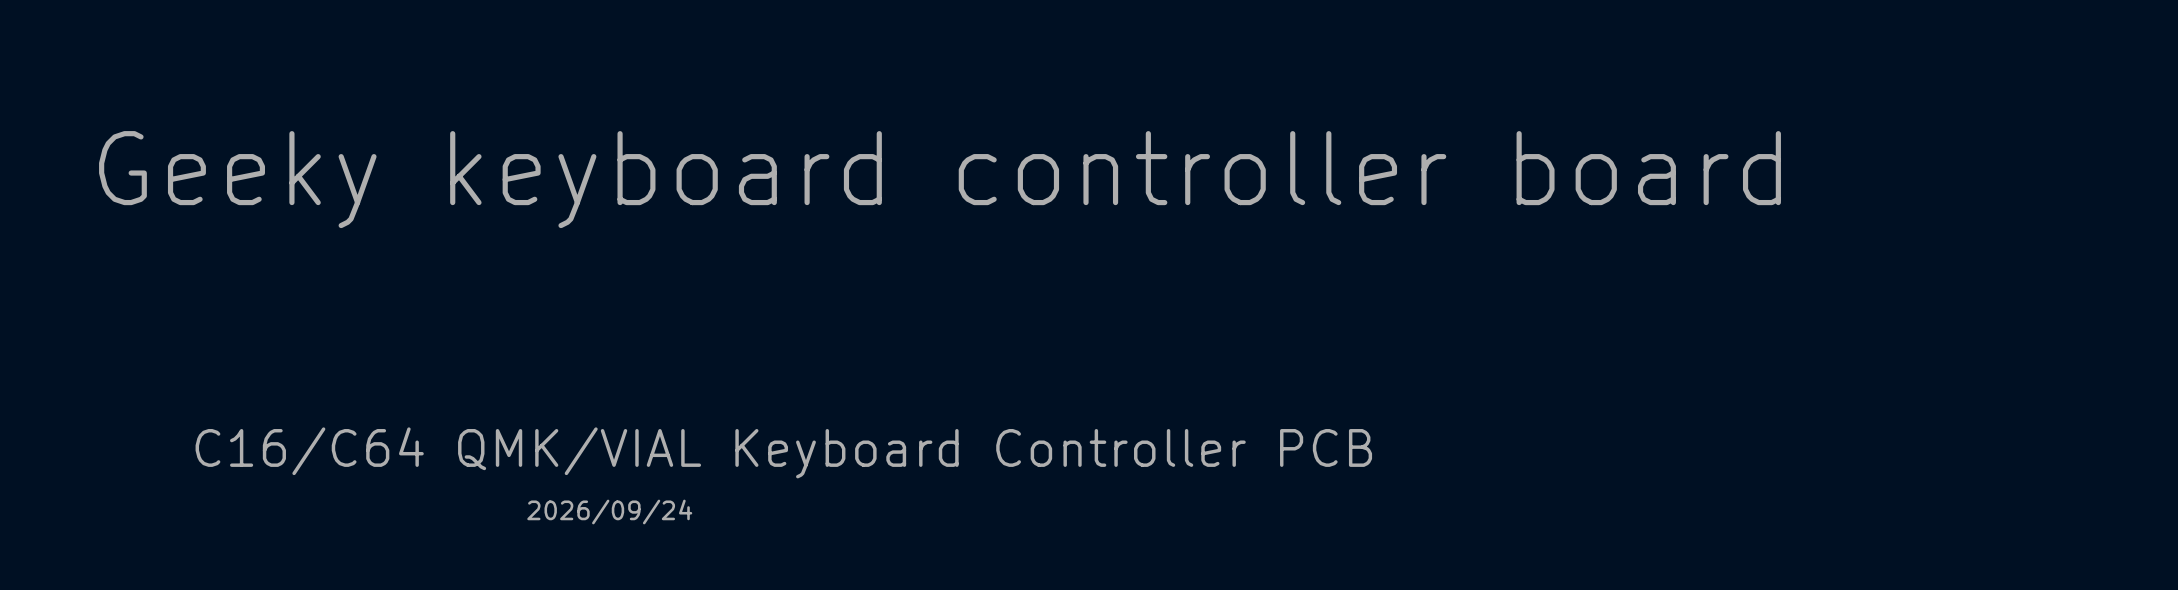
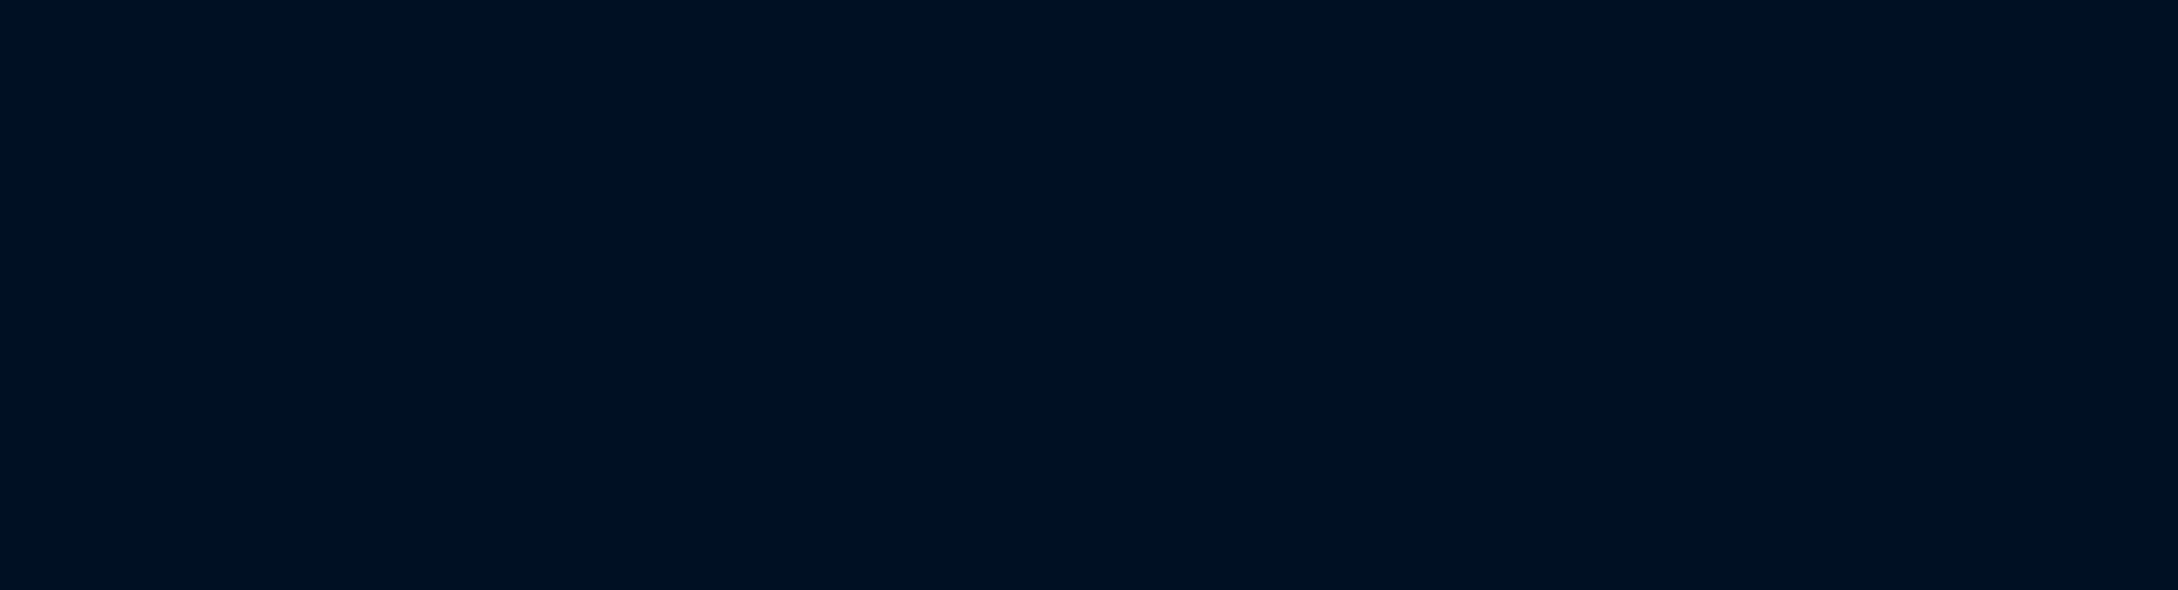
text: Geeky keyboard controller board (940, 179) -> none
text: C16/C64 QMK/VIAL Keyboard Controller PCB (783, 452) -> none
text: 2026/09/24 (609, 511) -> none

